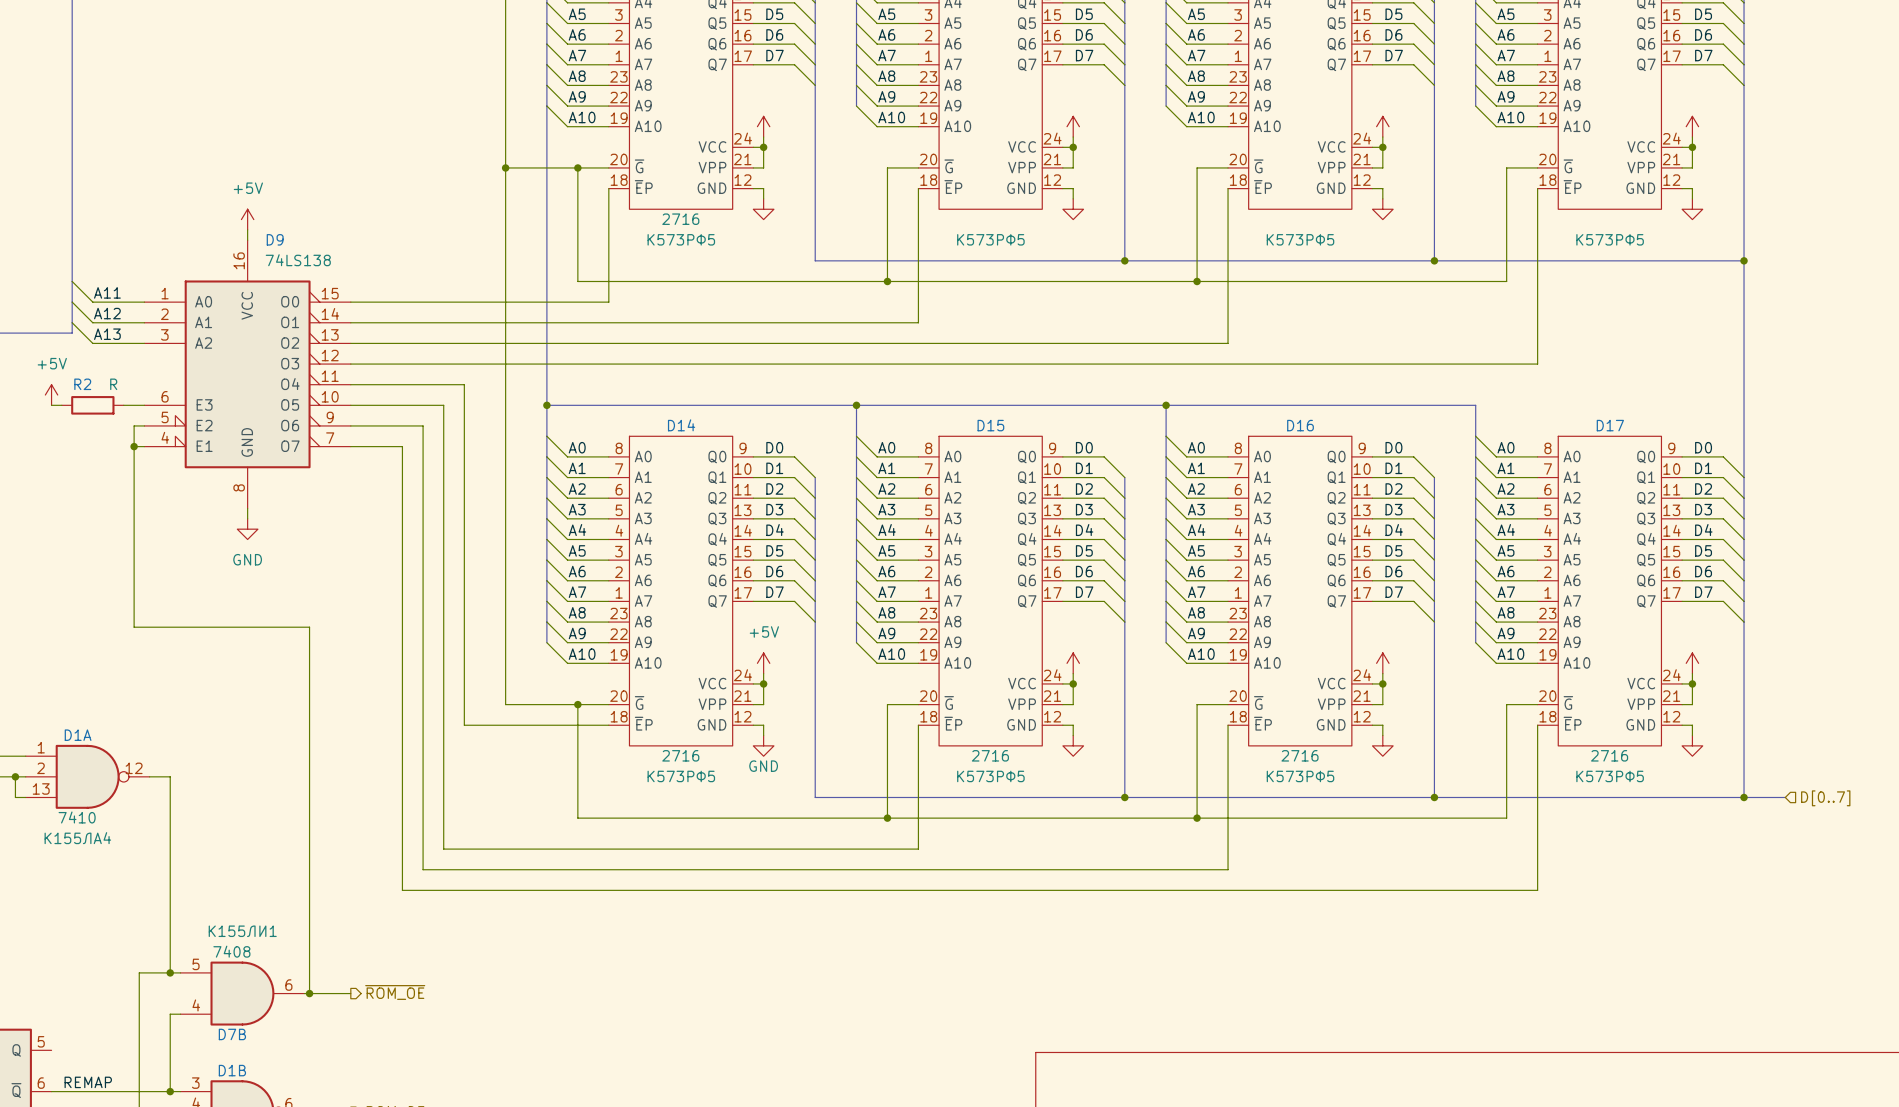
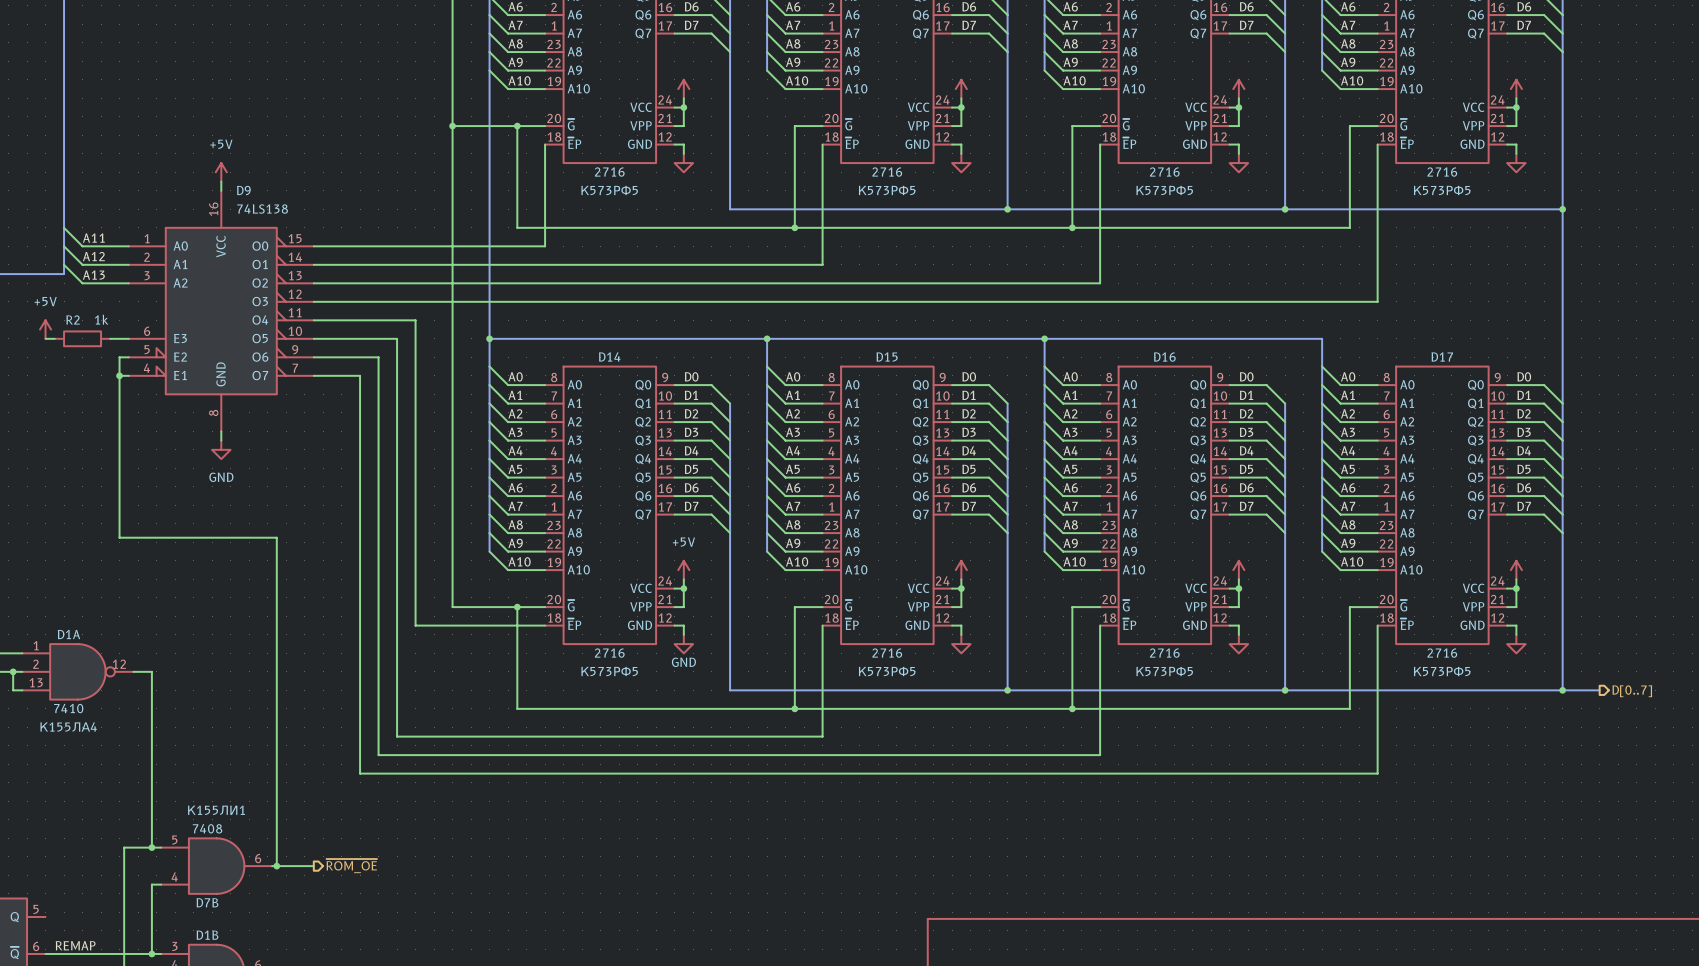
part value: none -> 2716 (887, 172)
part value: none -> 2716 (1164, 172)
part value: none -> 2716 (1442, 172)
R2 value: R (113, 384) -> 1k (101, 319)
hierarchical label shape: input (1825, 798) -> output (1632, 691)

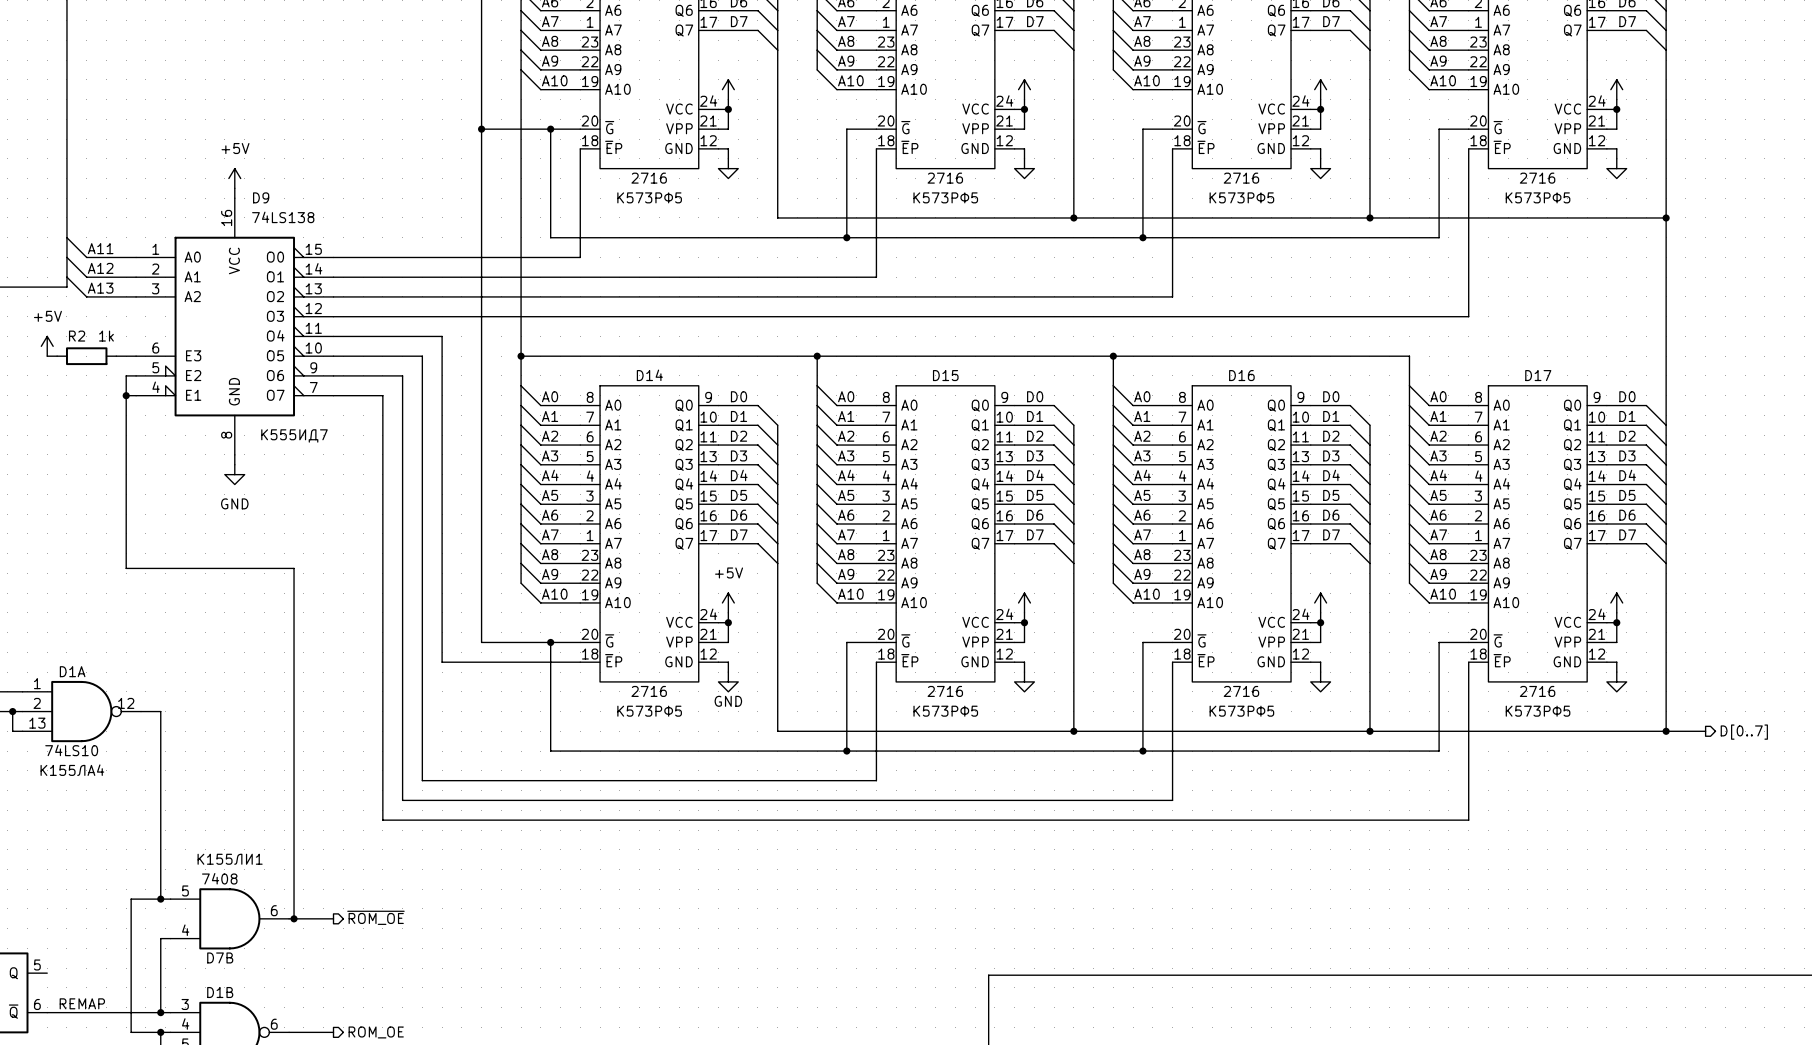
D9 text: none -> К555ИД7 (294, 435)
D1A value: 7410 (68, 708) -> 74LS10 (71, 750)

